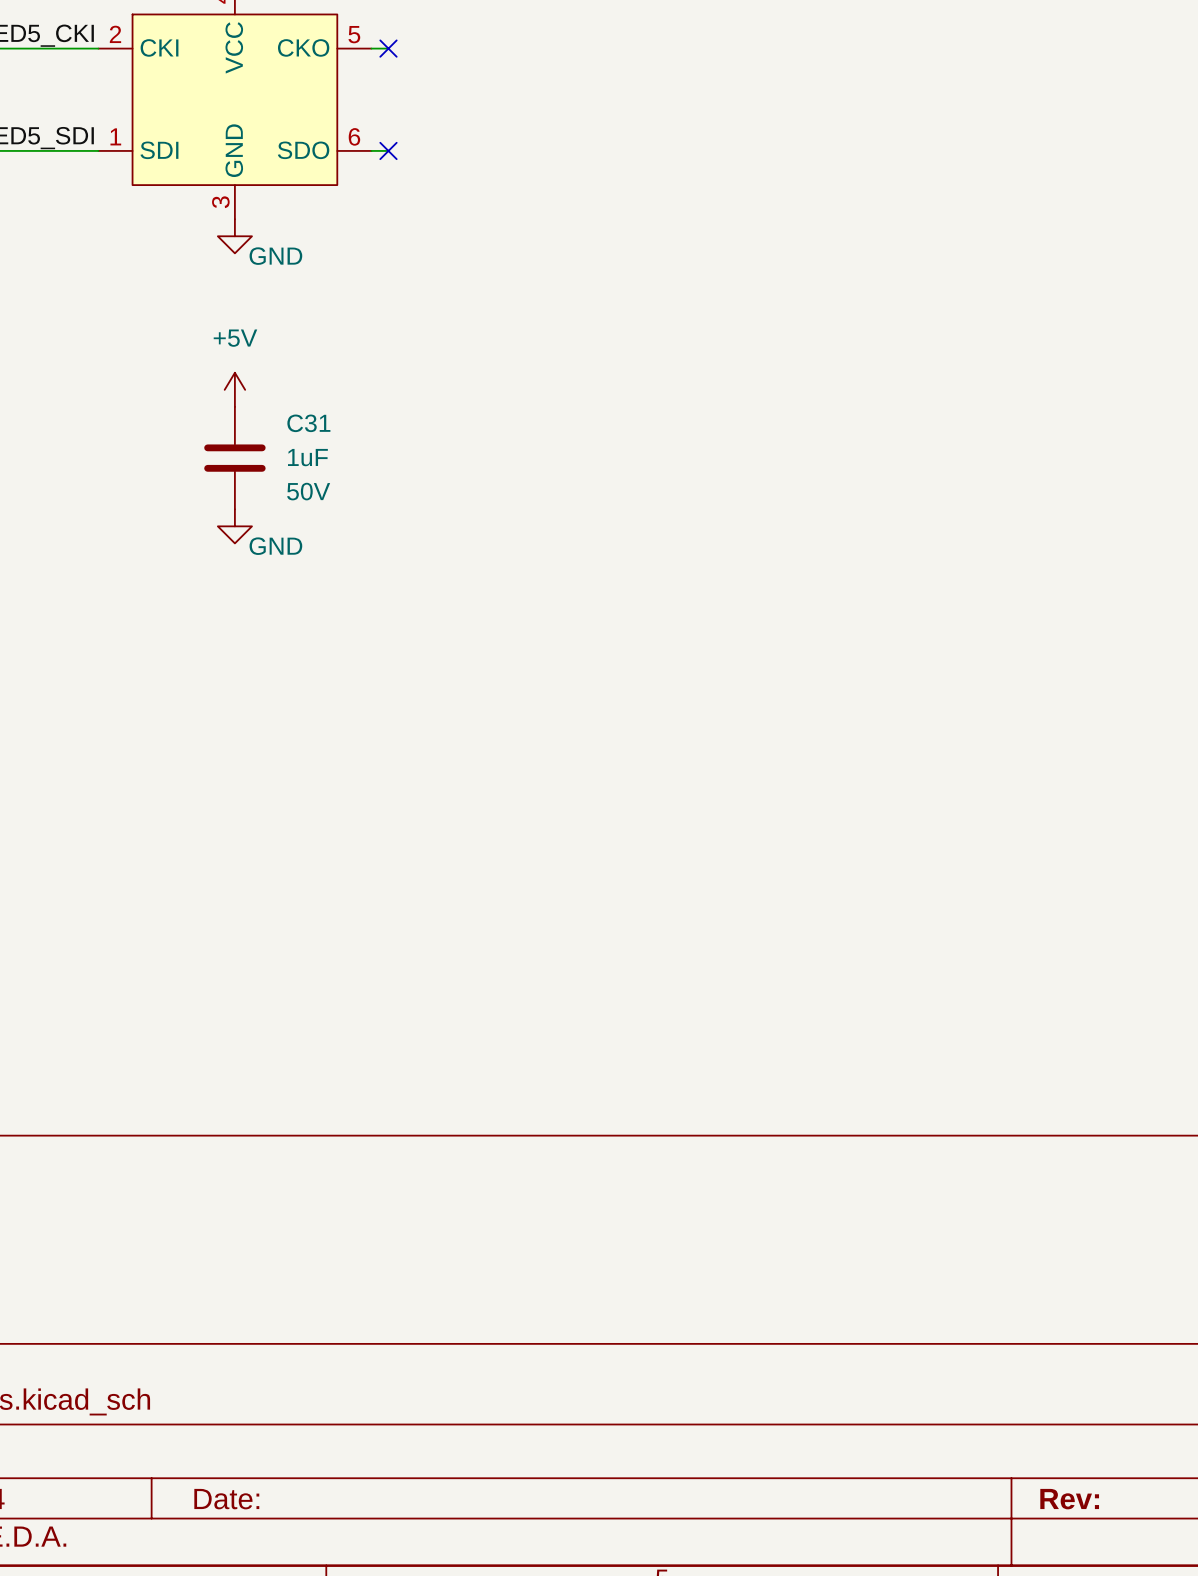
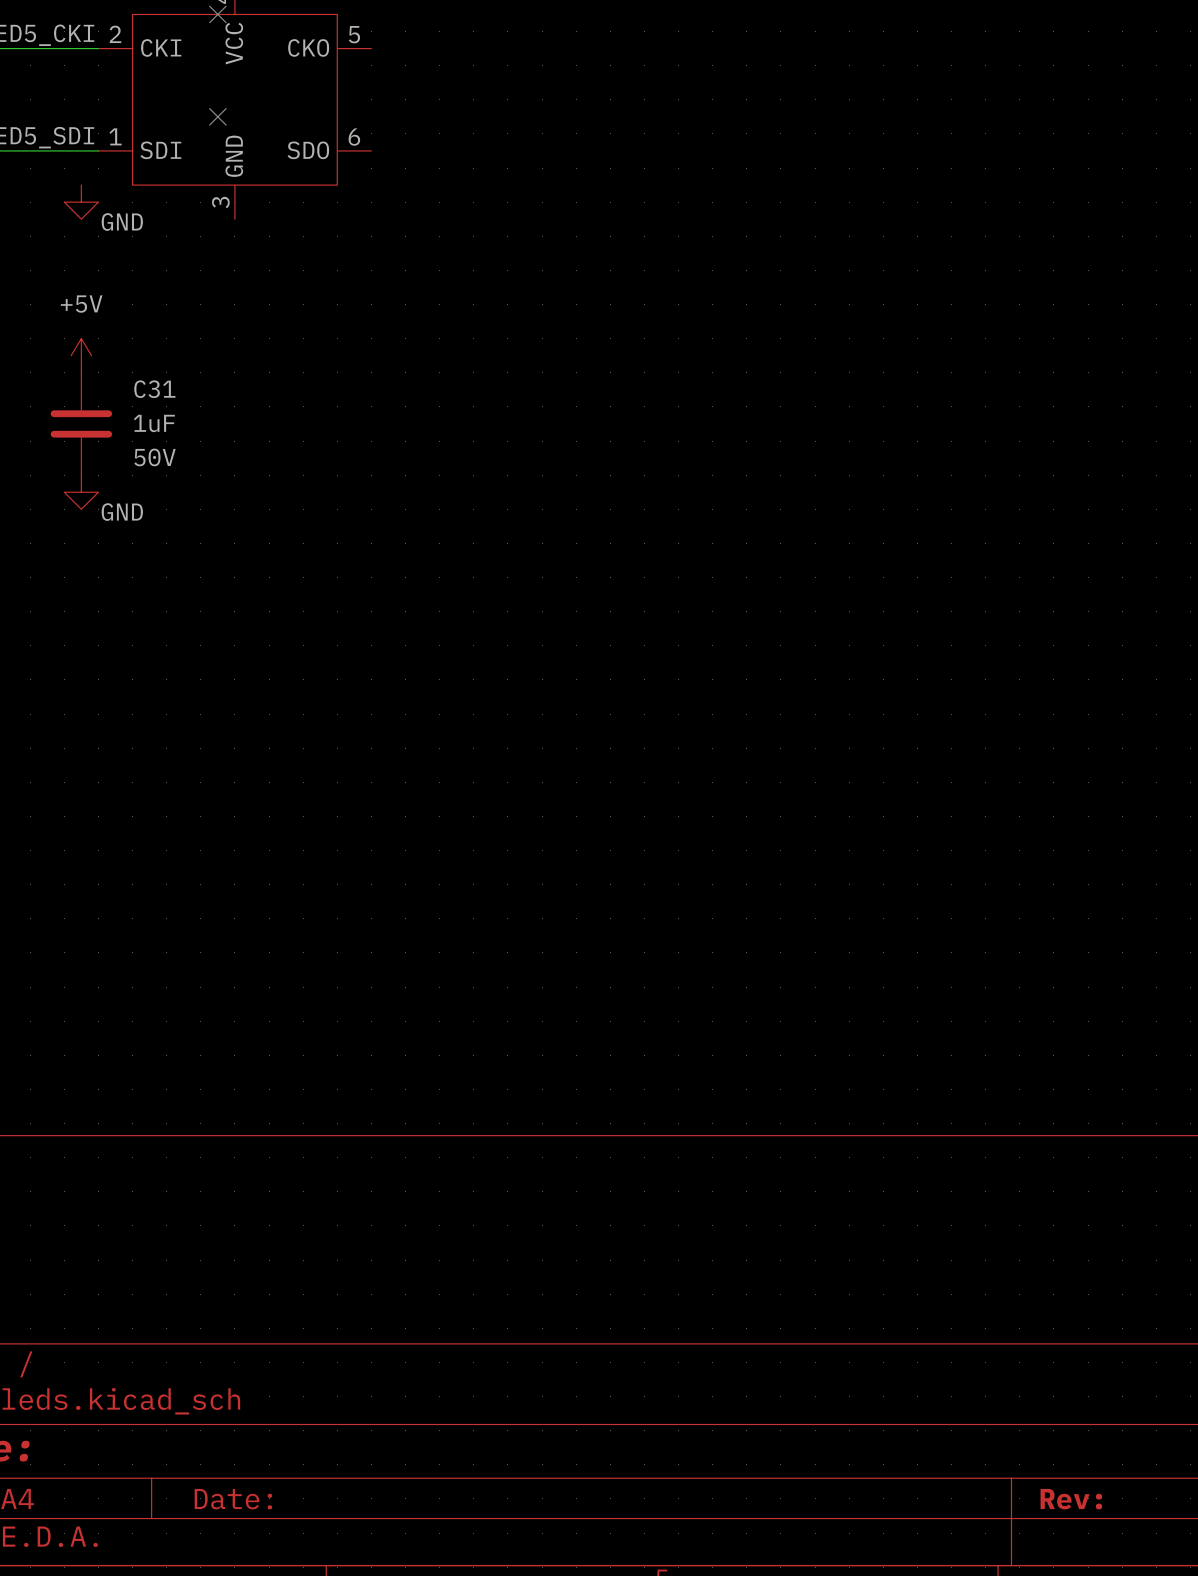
no-connect mark: none -> (217, 14)
wire: (371, 48) (388, 48) -> none
no-connect mark: (388, 48) -> none
no-connect mark: none -> (217, 116)
wire: (371, 150) (388, 150) -> none
no-connect mark: (388, 150) -> none
power symbol: none -> GND (81, 202)
power symbol: GND (234, 236) -> none
power symbol position: +5V (234, 389) -> +5V (81, 355)
C31 position: (234, 458) -> (81, 423)
power symbol: none -> GND (81, 492)
power symbol: GND (234, 526) -> none

